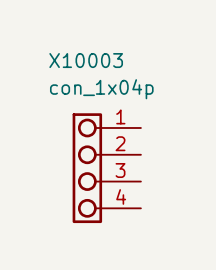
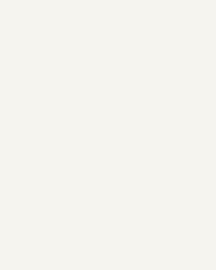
X10003: con_1x04p (106, 168) -> none

